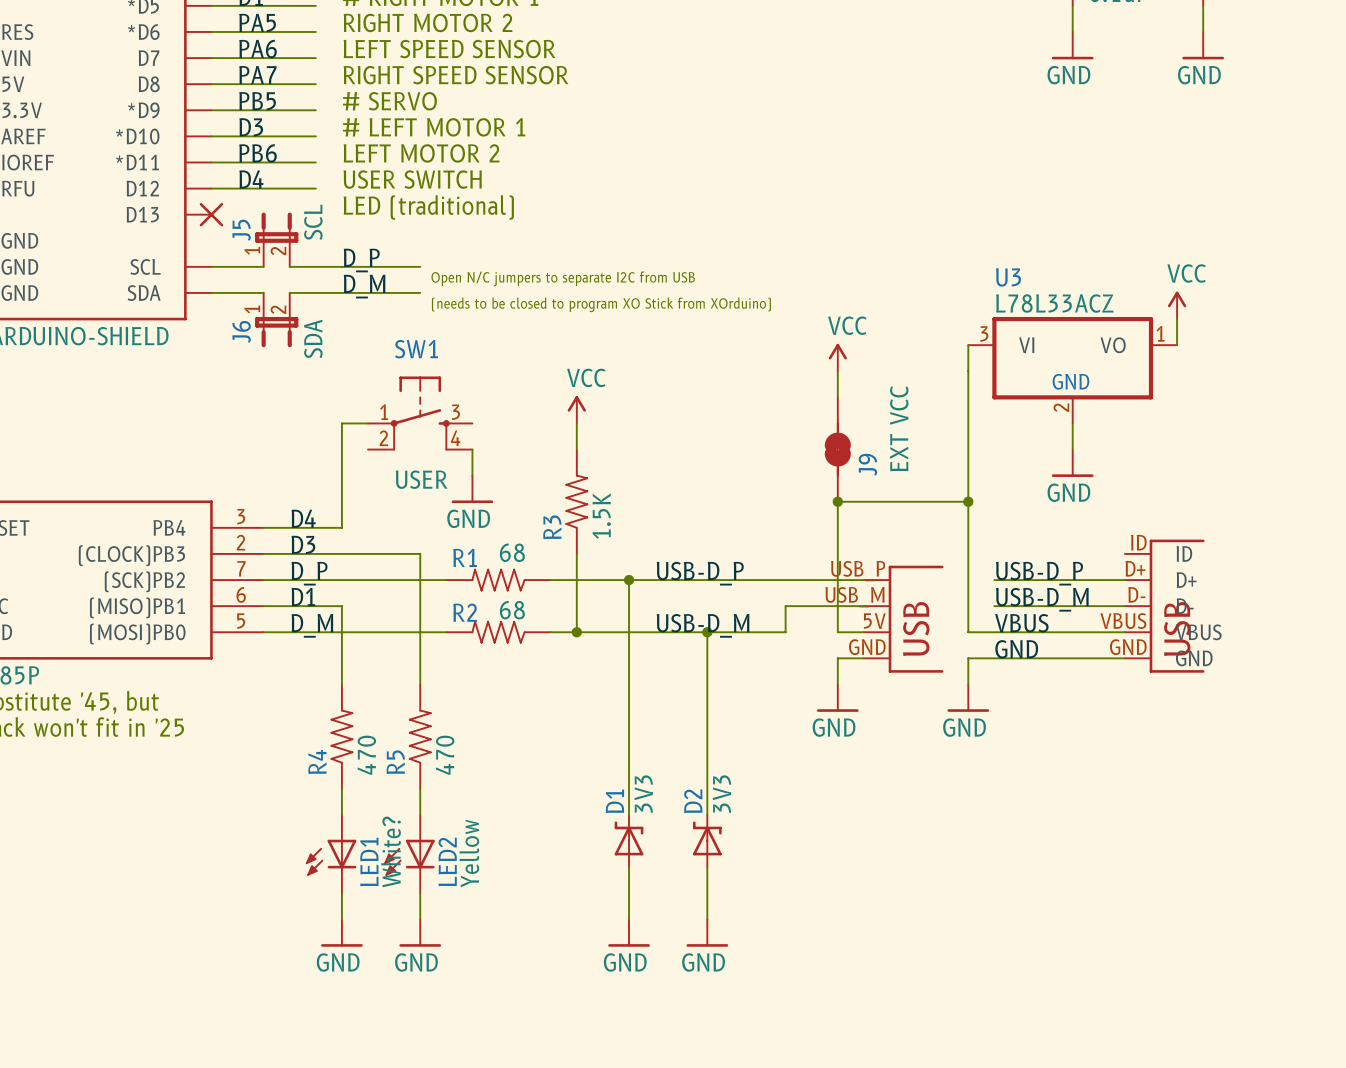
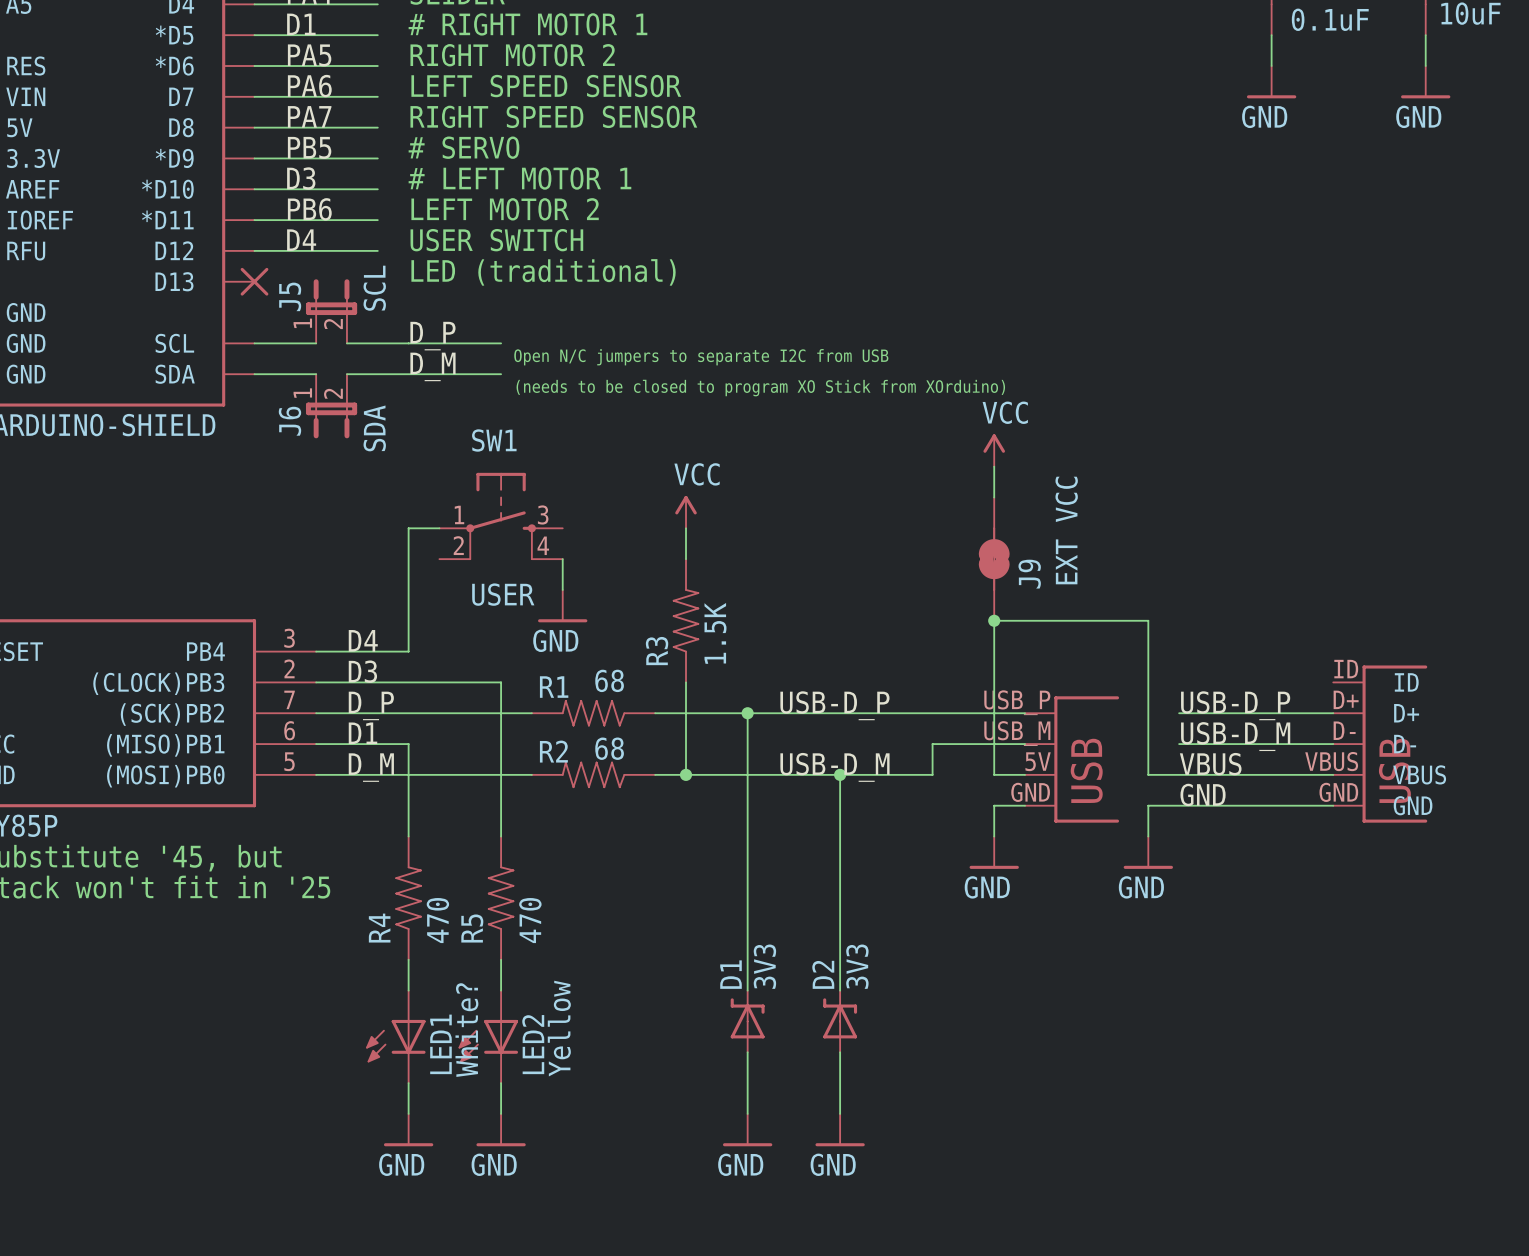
power symbol: VCC (1177, 305) -> none
wire: (1177, 319) (1177, 345) -> none
wire: (968, 345) (968, 501) -> none
U3: L78L33ACZ (1072, 370) -> none
wire: (1072, 423) (1072, 449) -> none
power symbol: GND (1072, 463) -> none
junction: (968, 501) -> none

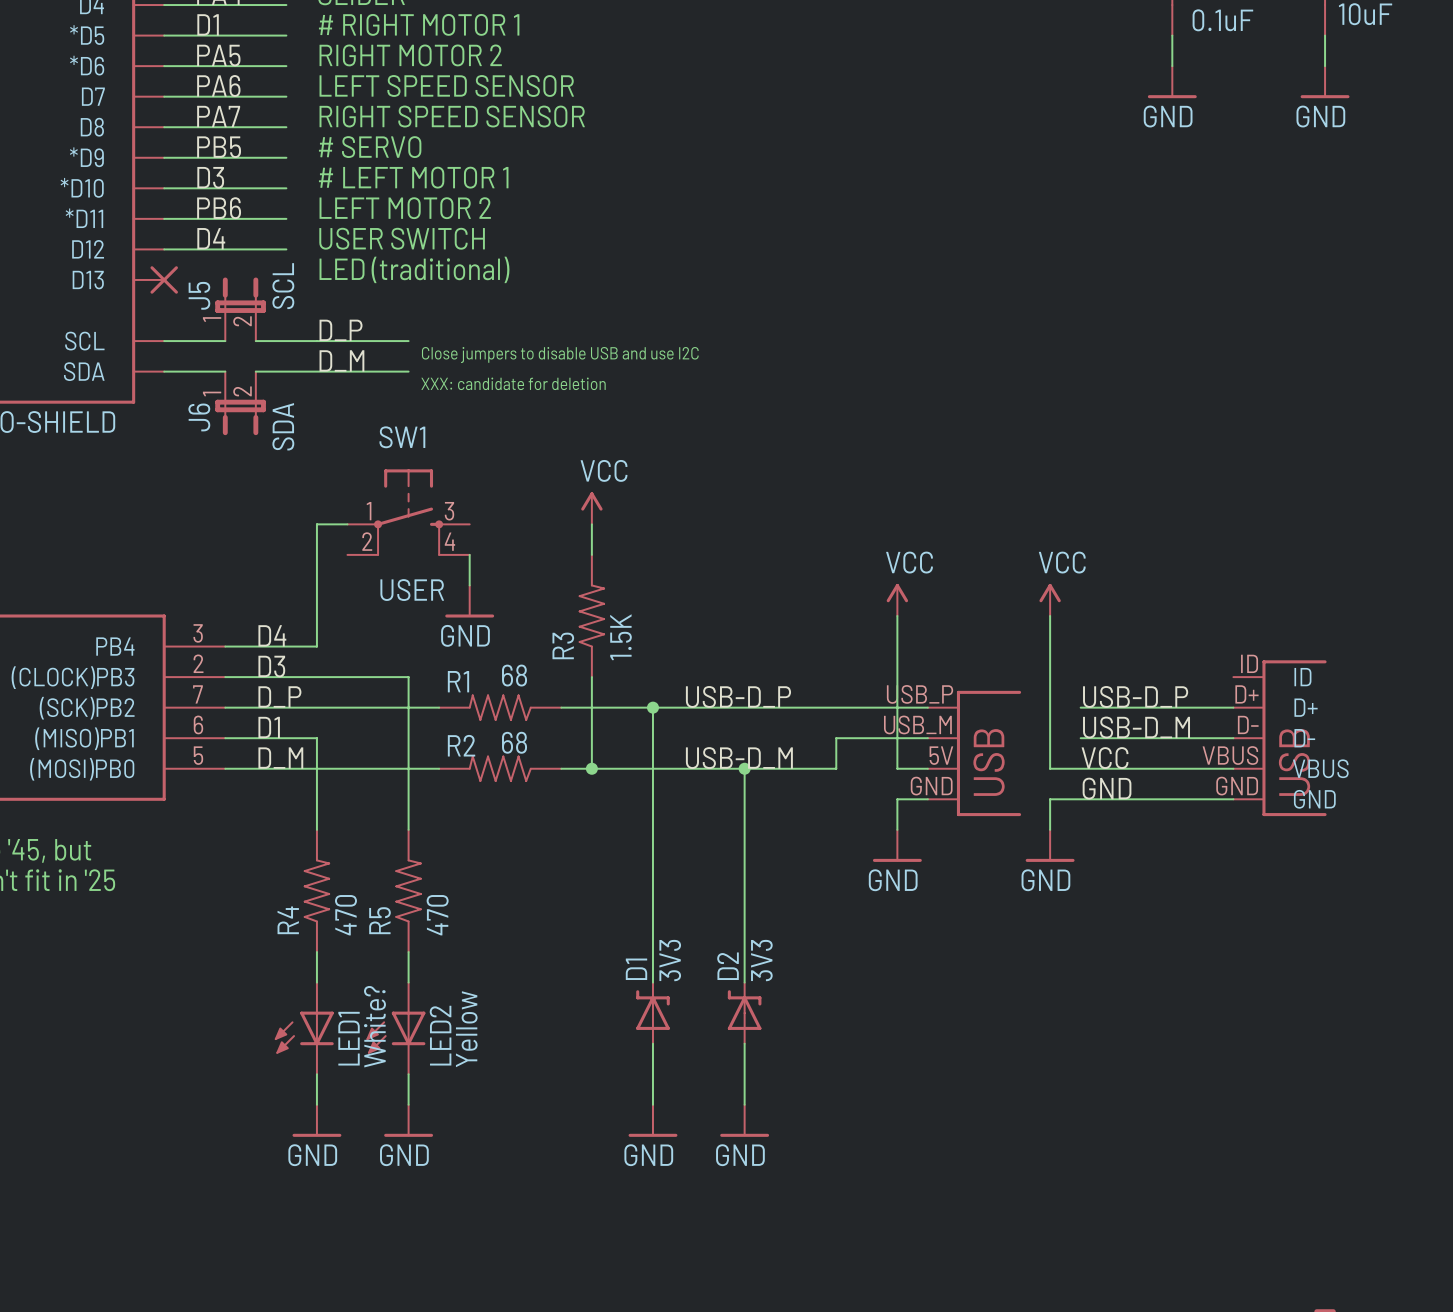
text: Open N/C jumpers to separate I2C from USB (701, 357) -> Close jumpers to disable USB and use I2C (560, 355)
text: (needs to be closed to program XO Stick from XOrduino) (760, 388) -> XXX: candidate for deletion (513, 383)
power symbol: VCC (994, 450) -> none
wire: (994, 466) (994, 497) -> none
J9: EXT VCC (994, 559) -> none
power symbol: none -> VCC (897, 599)
power symbol: none -> VCC (1050, 599)
wire: (994, 620) (1148, 620) -> none
junction: (994, 620) -> none
label: VBUS (1210, 764) -> VCC (1105, 758)

